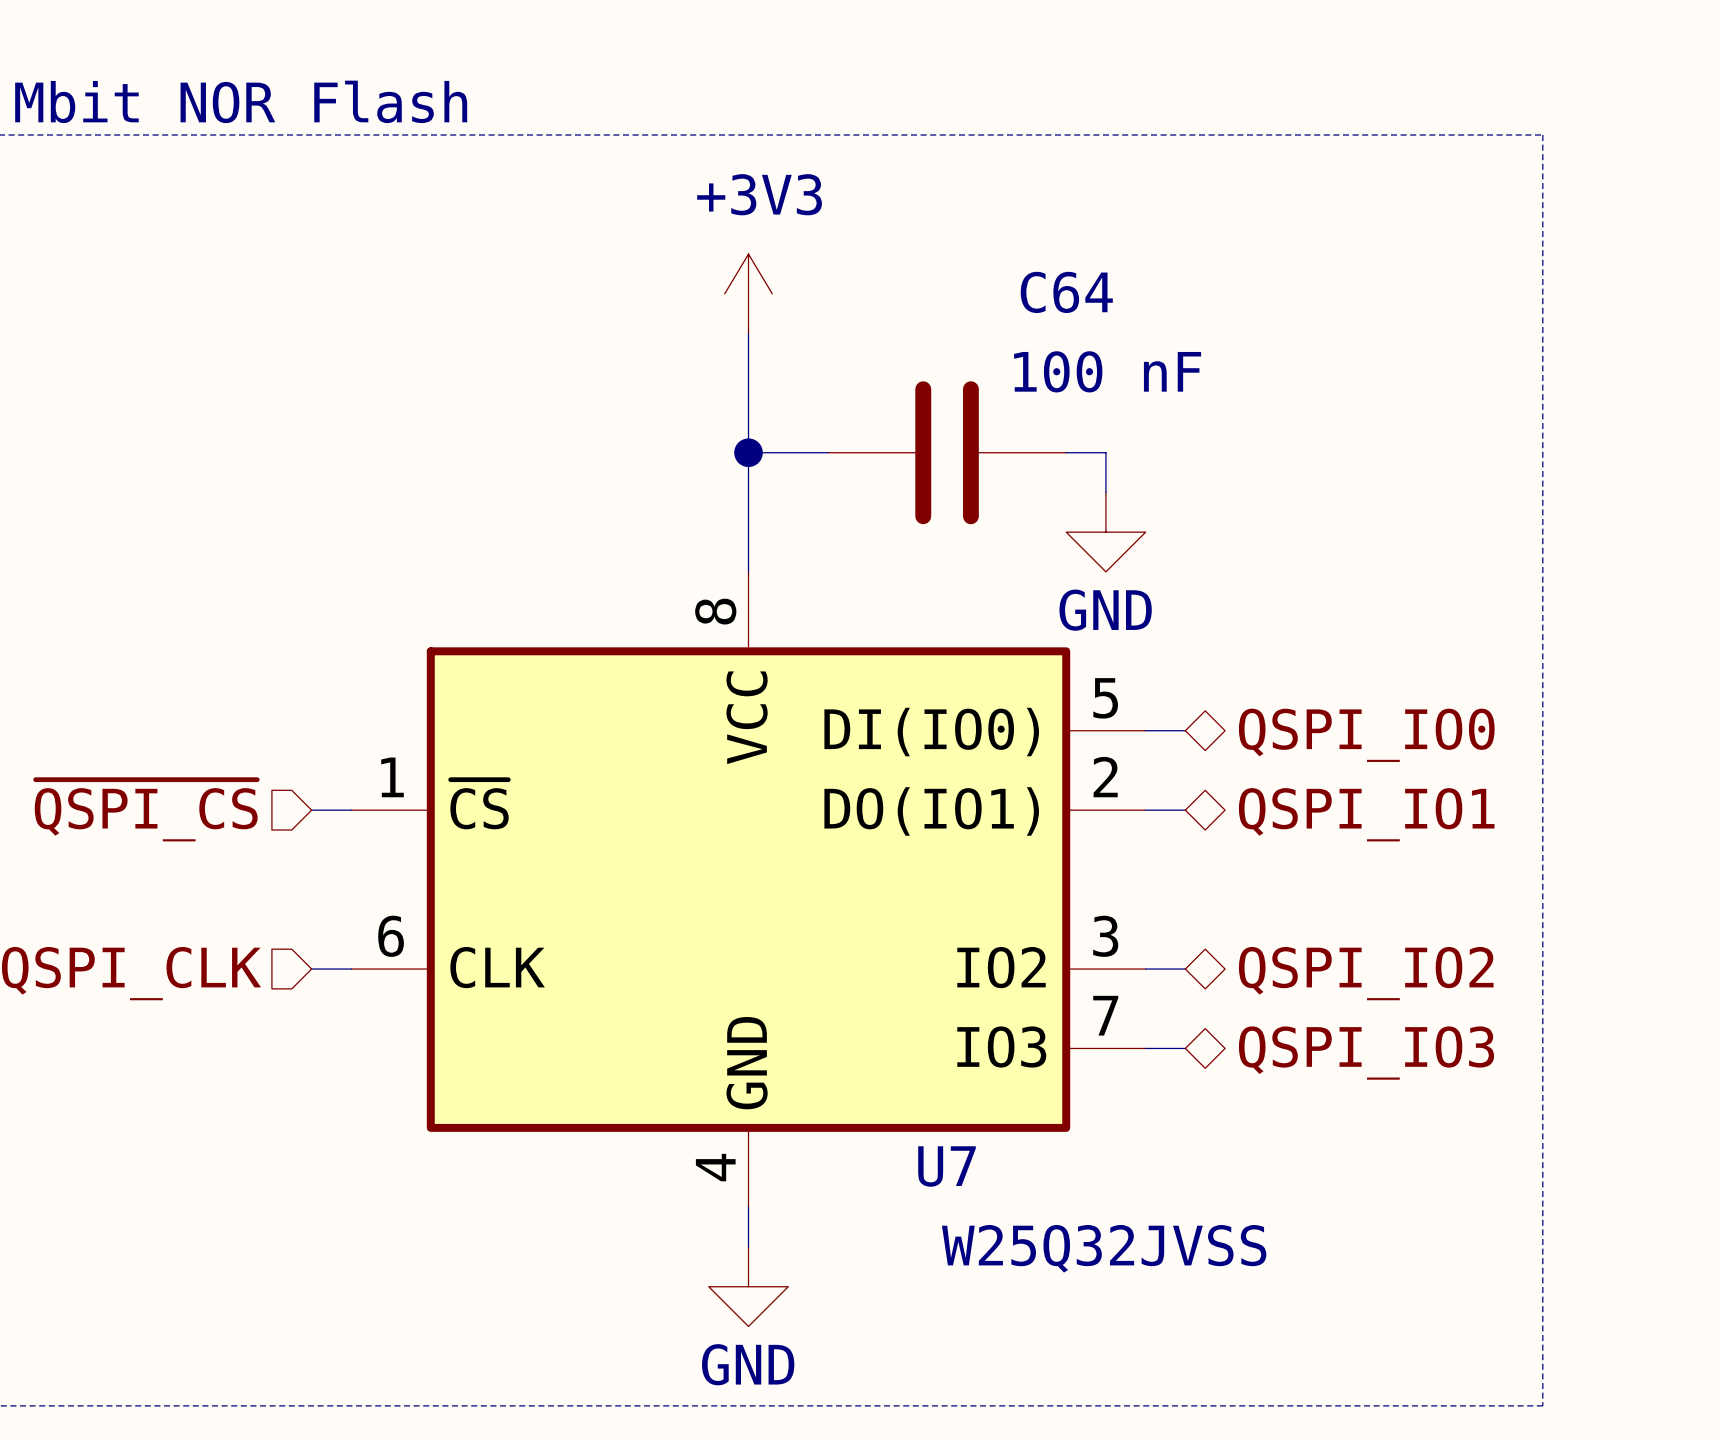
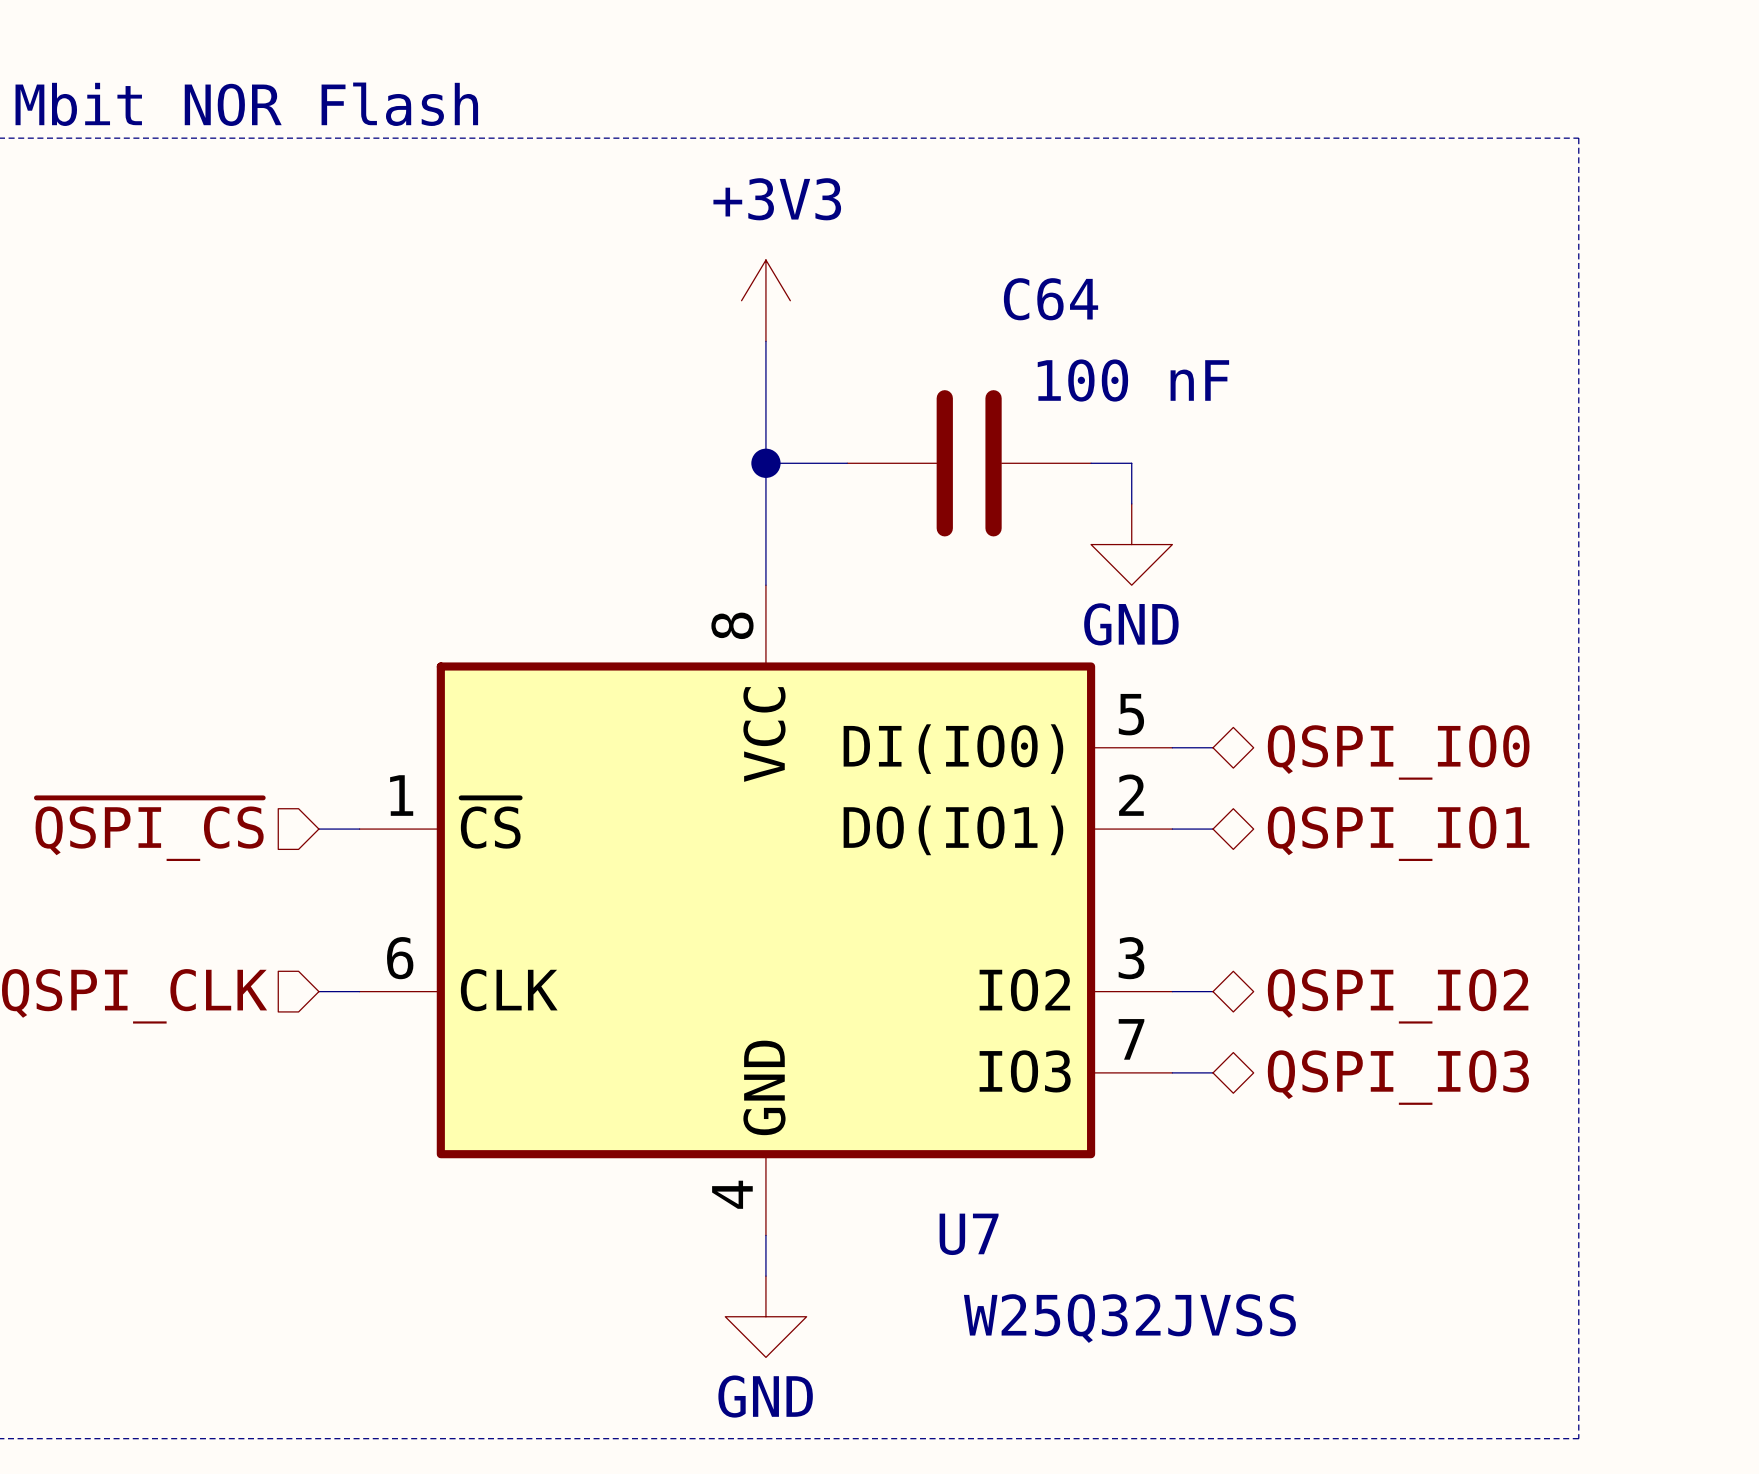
C64 name position: C64 (1066, 292) -> C64 (1051, 299)
U7 name position: U7 (946, 1166) -> U7 (969, 1234)
U7 value position: W25Q32JVSS (1104, 1248) -> W25Q32JVSS (1129, 1318)

